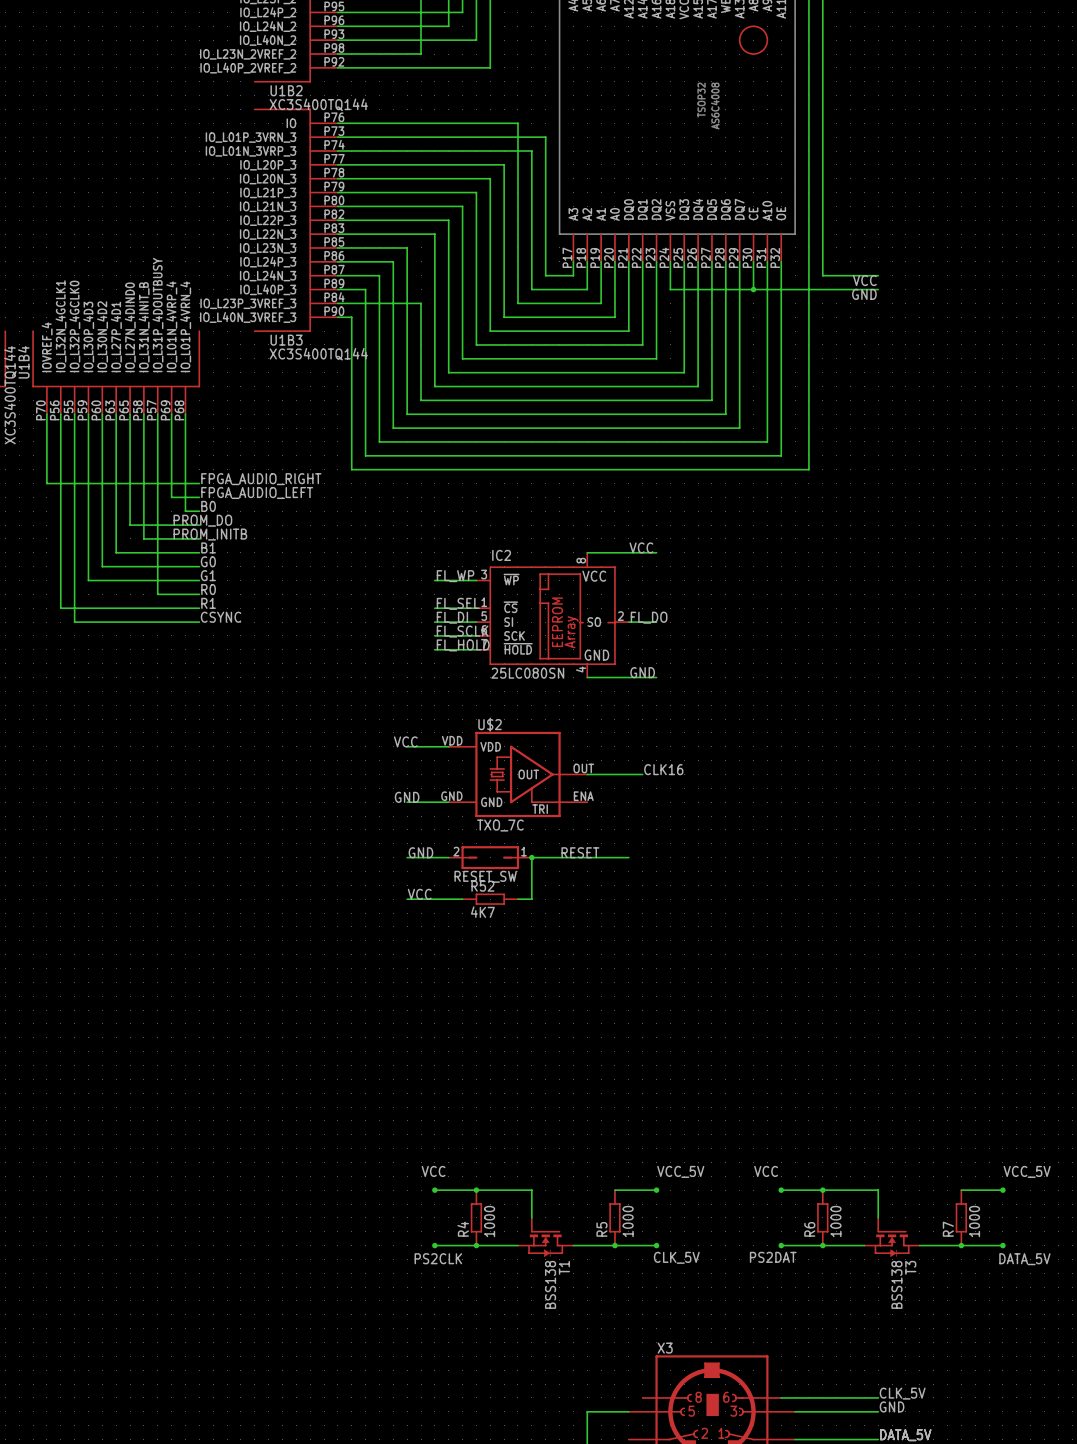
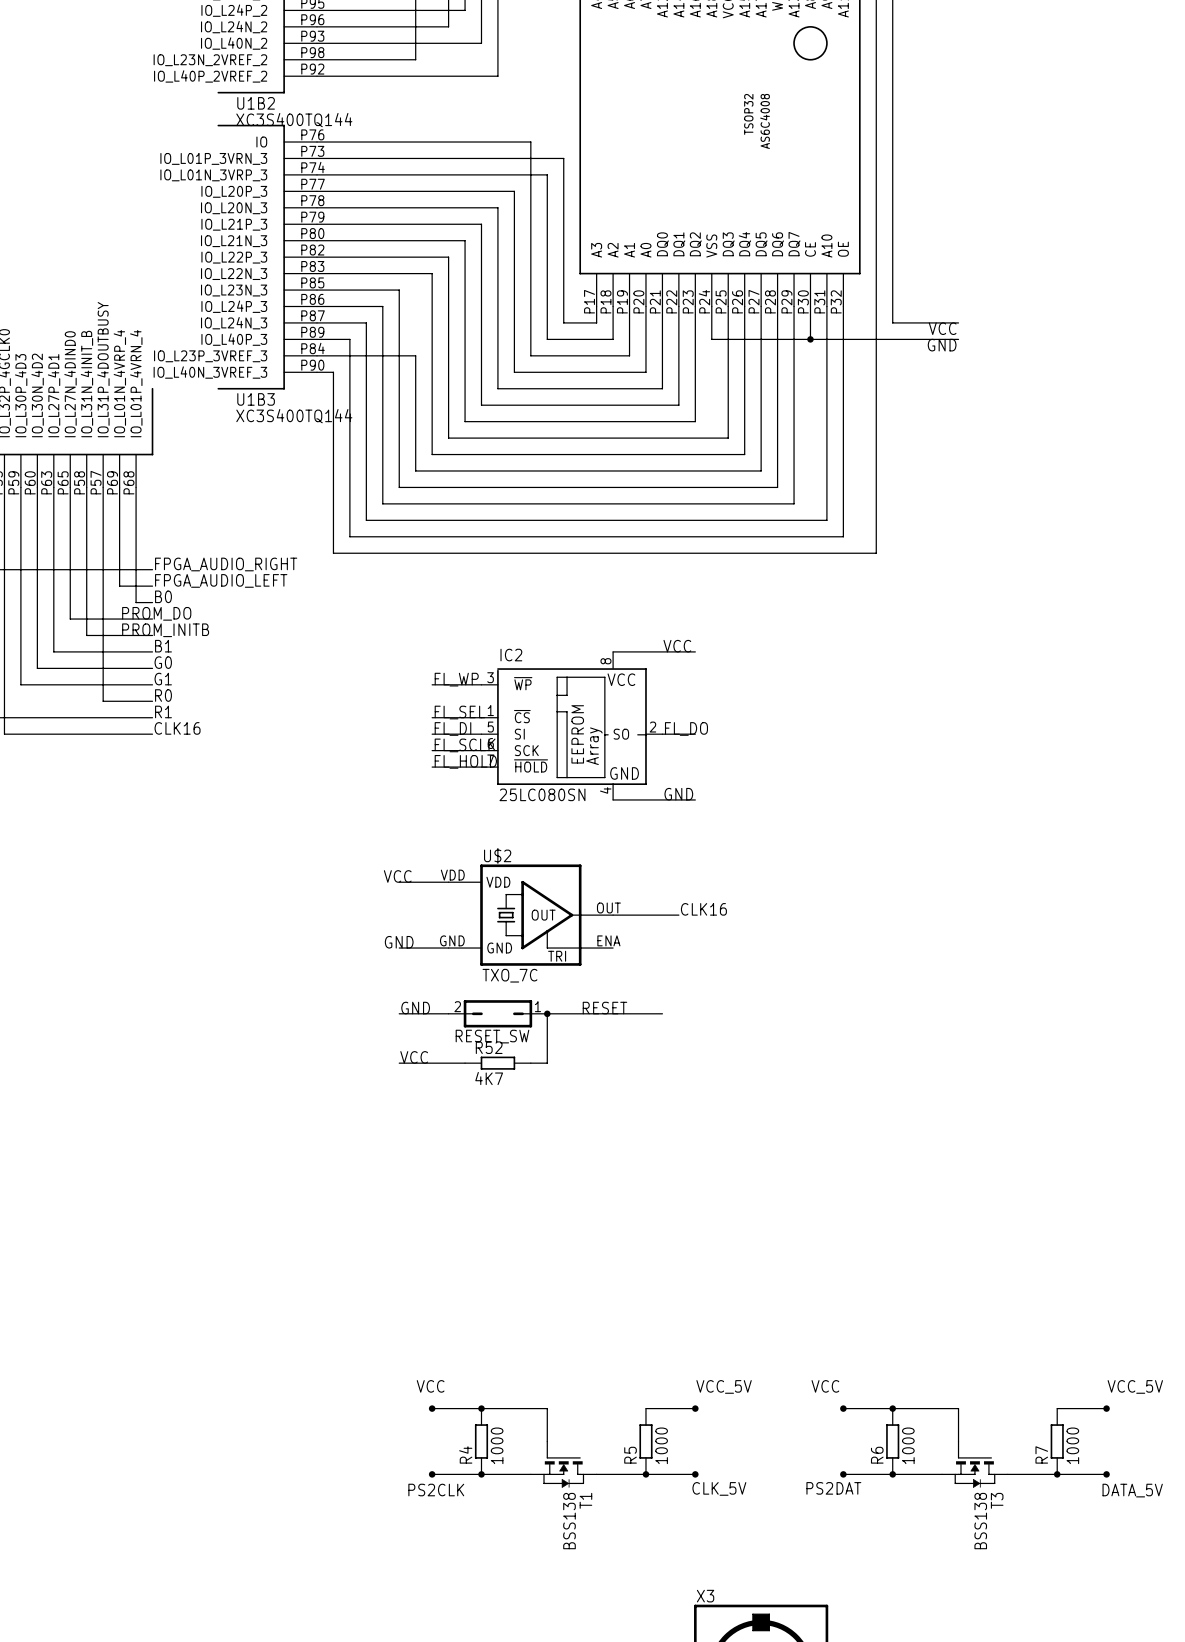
label: CSYNC (221, 617) -> CLK16 (177, 728)

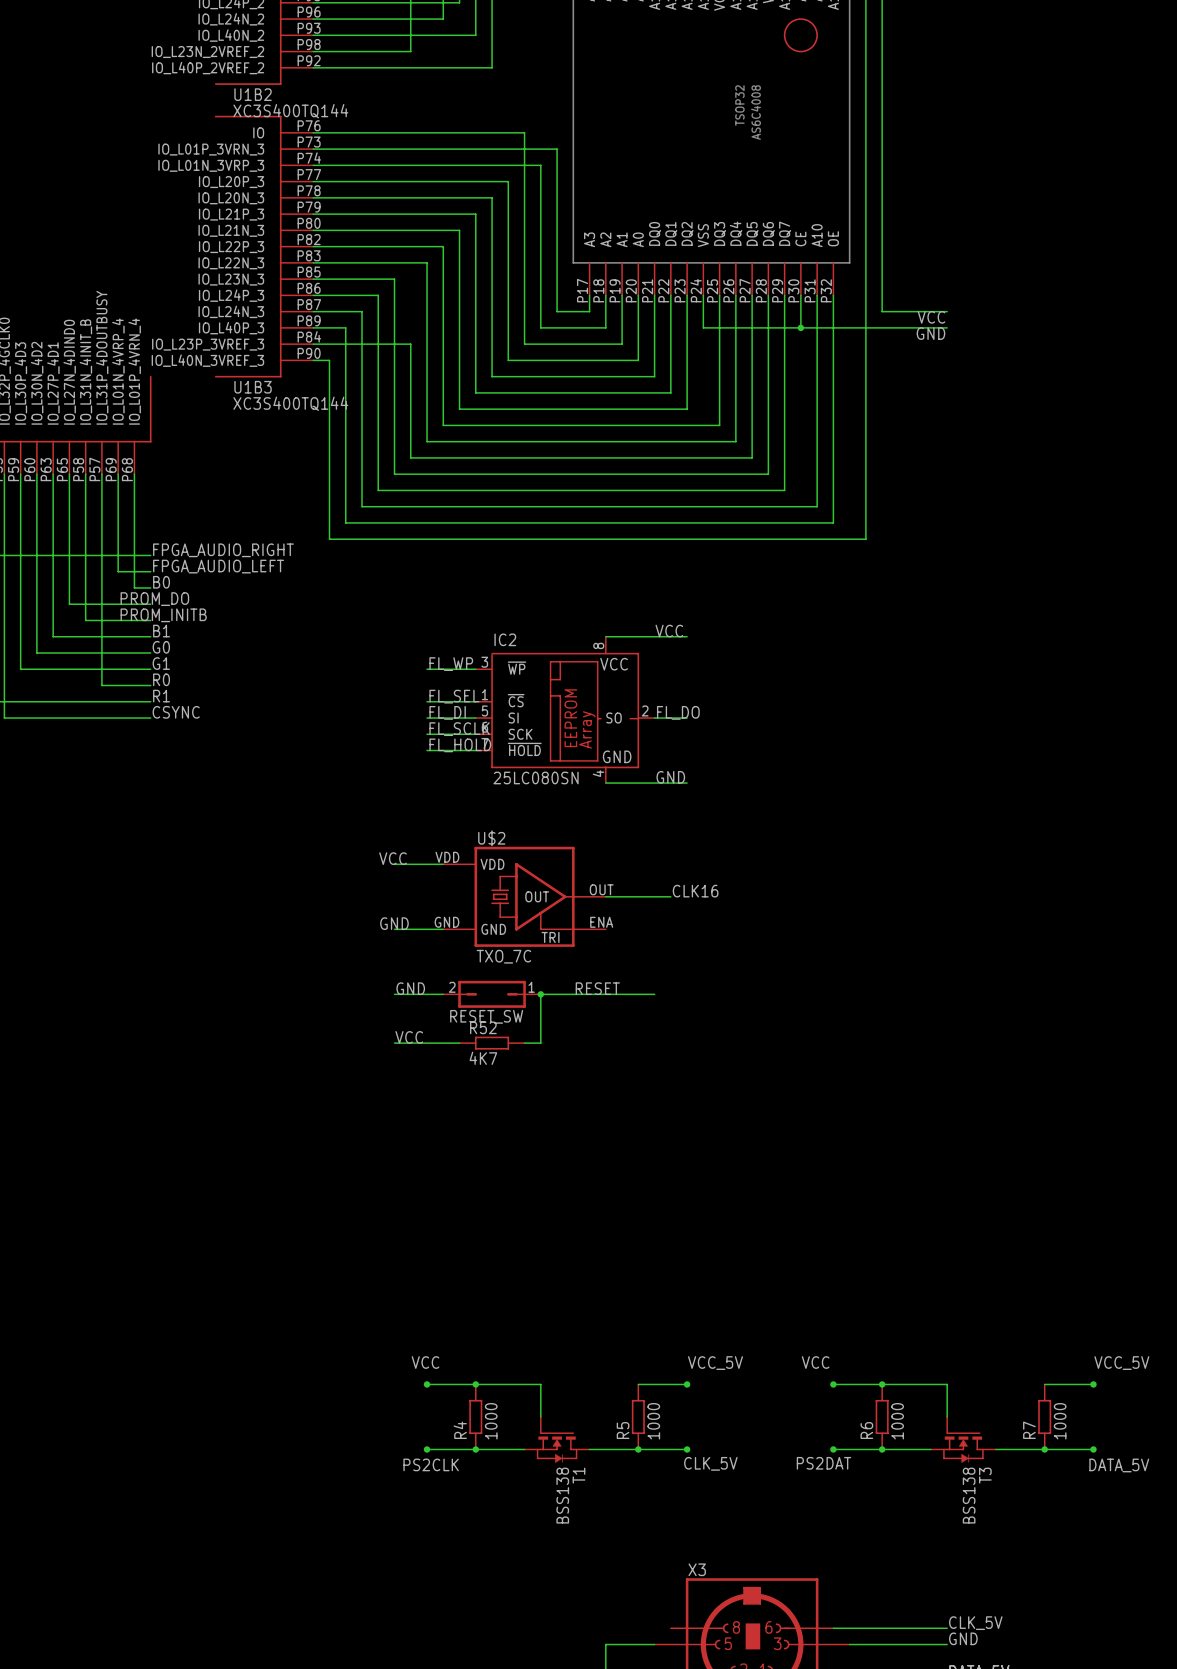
label: CLK16 (177, 728) -> CSYNC (176, 712)

